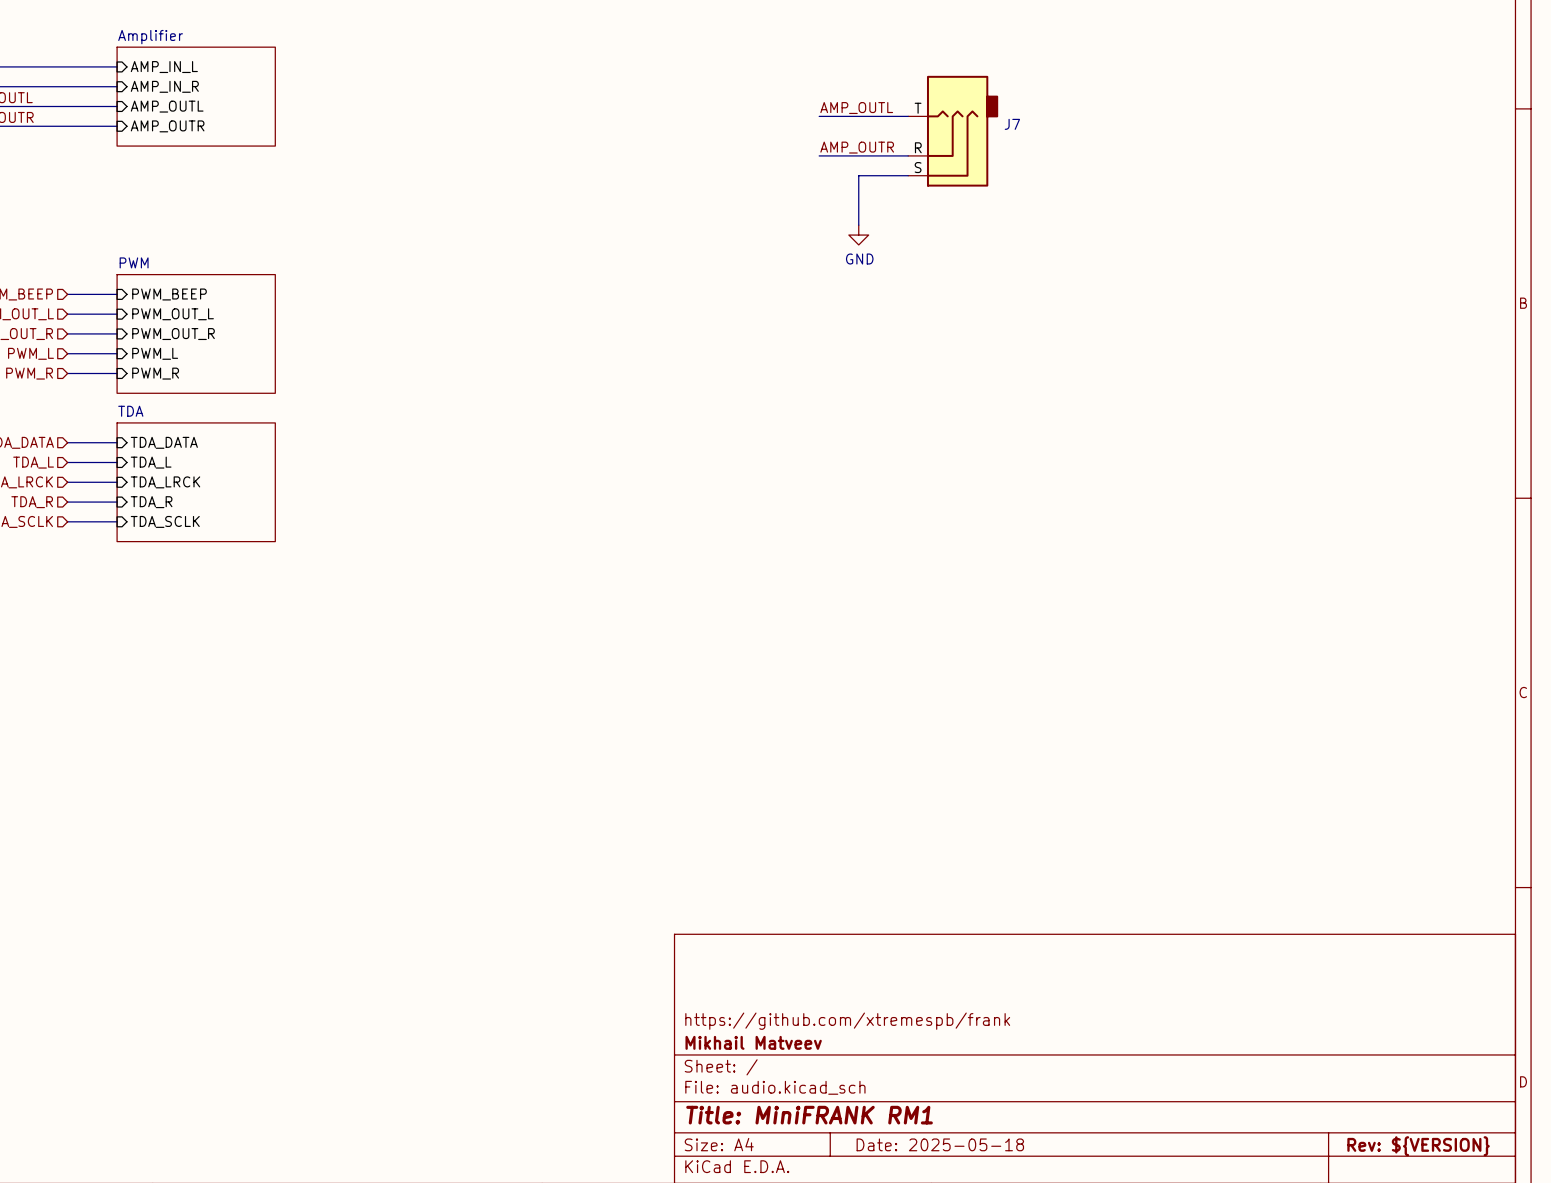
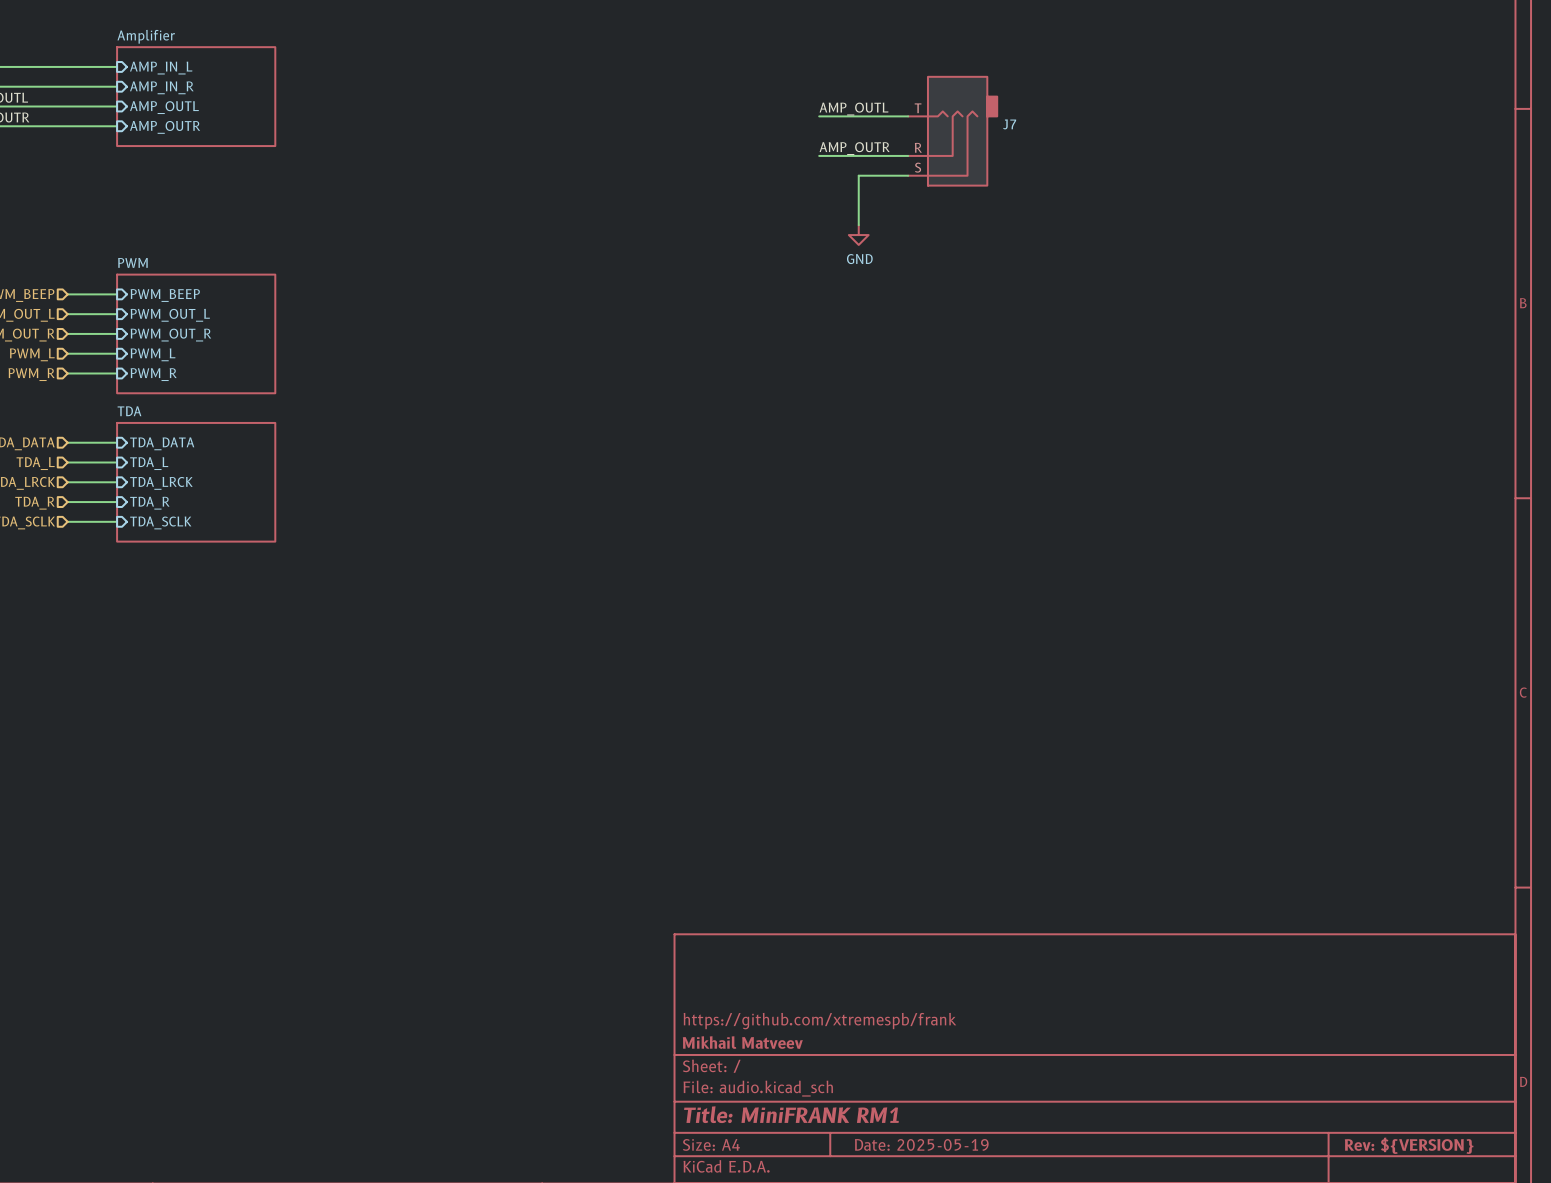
title block: Date: 2025-05-18 (940, 1144) -> Date: 2025-05-19 (921, 1144)

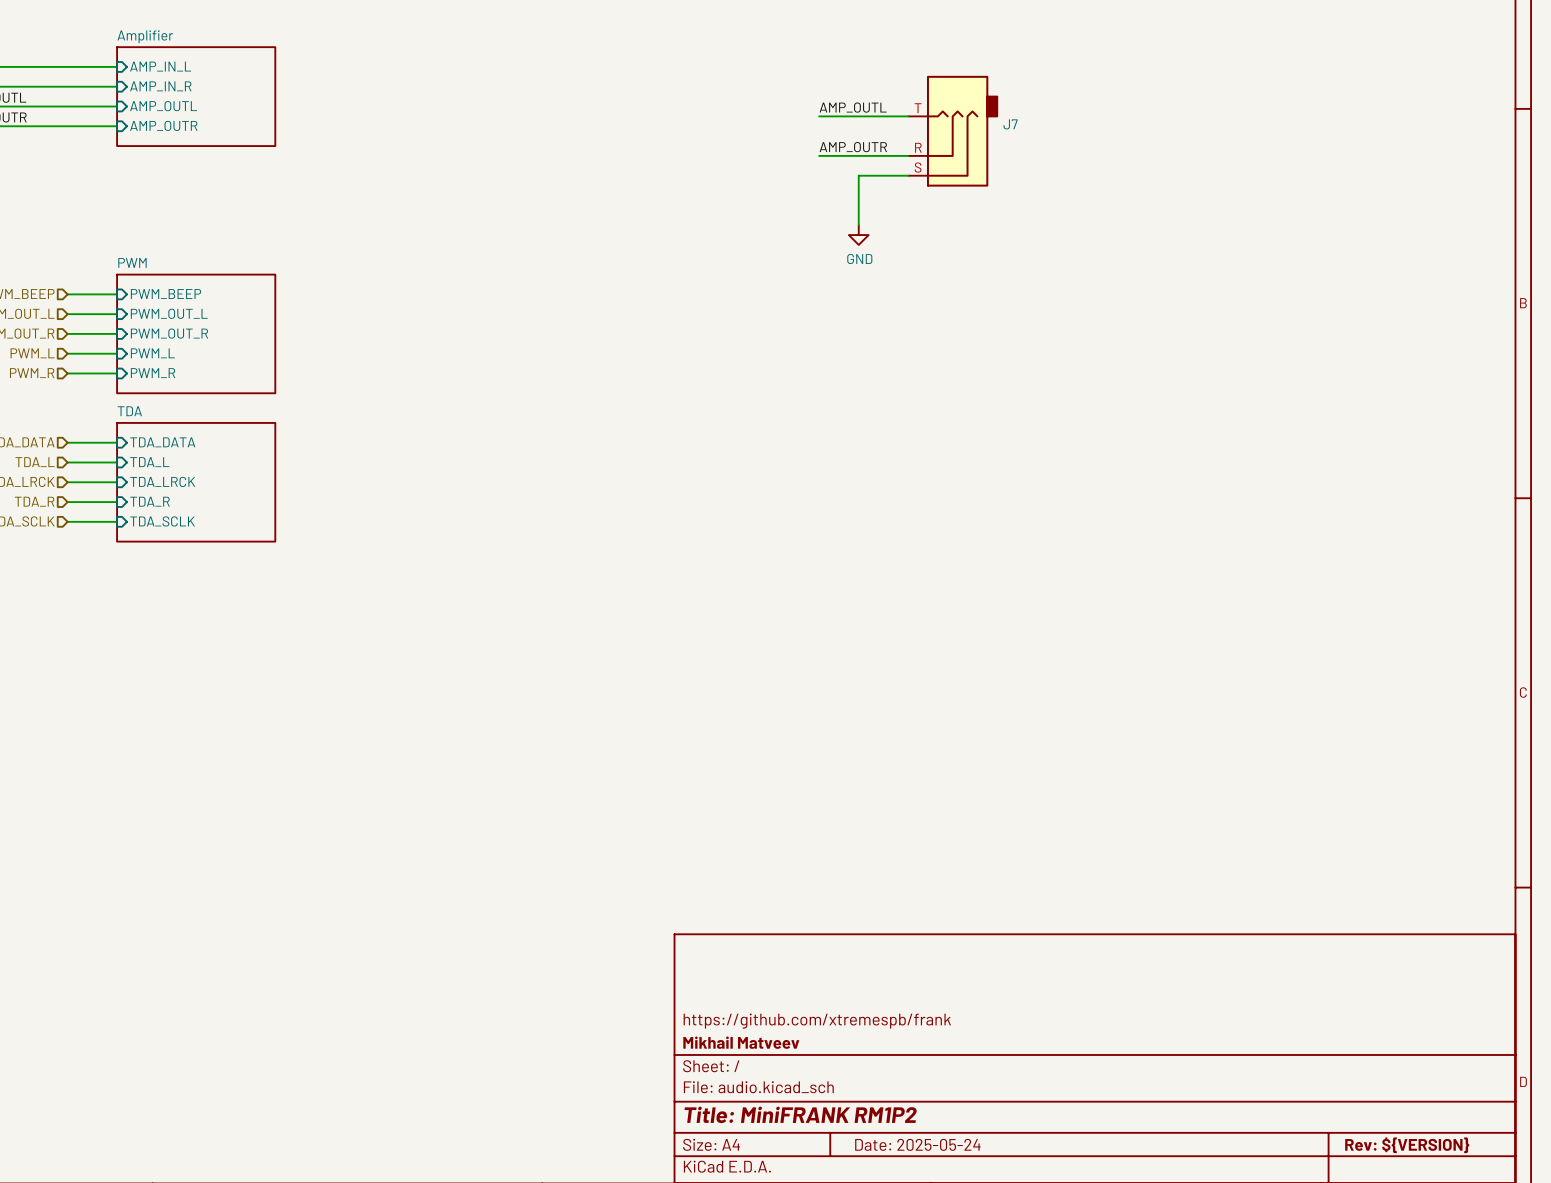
title block: Title: MiniFRANK RM1 (791, 1114) -> Title: MiniFRANK RM1P2 (800, 1114)
title block: Date: 2025-05-19 (921, 1144) -> Date: 2025-05-24 (917, 1144)

